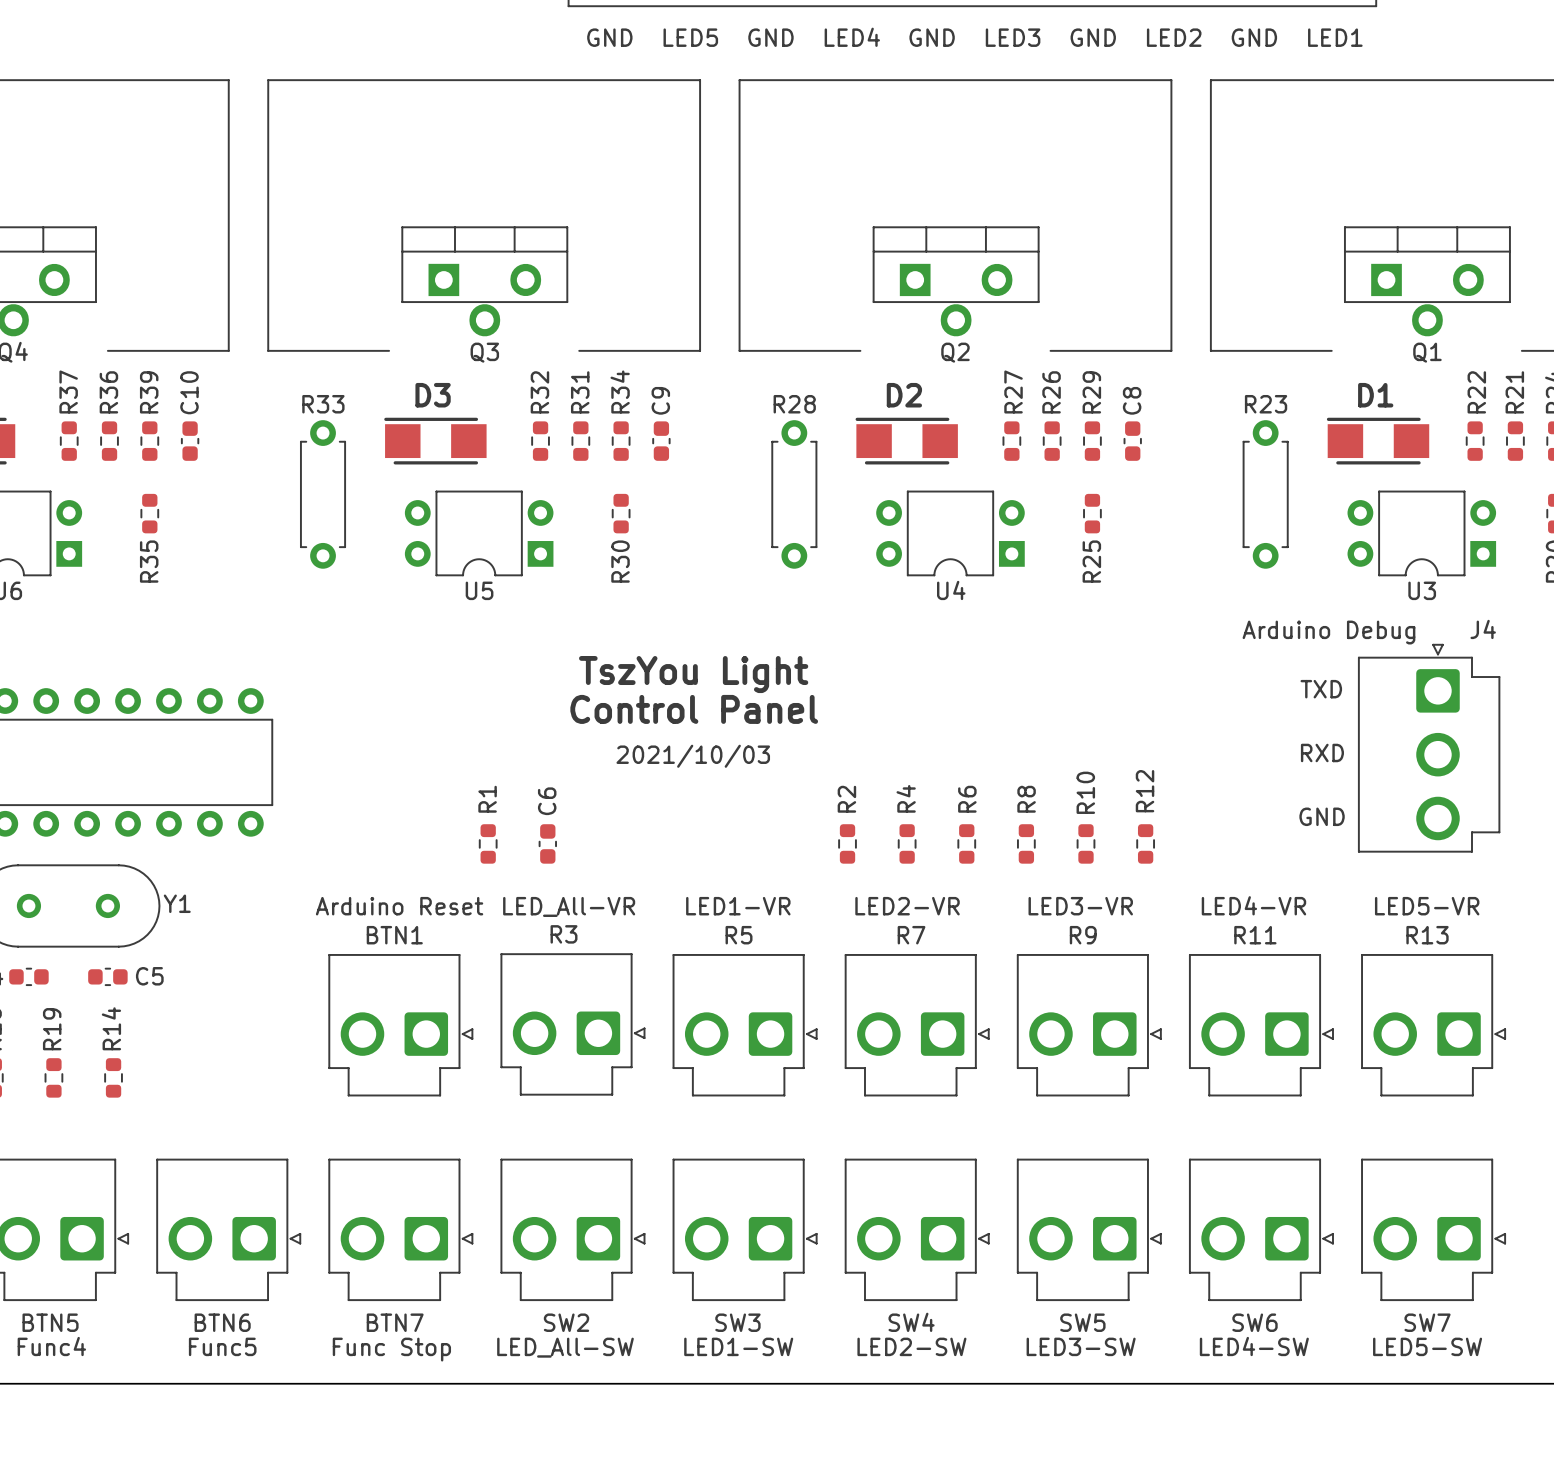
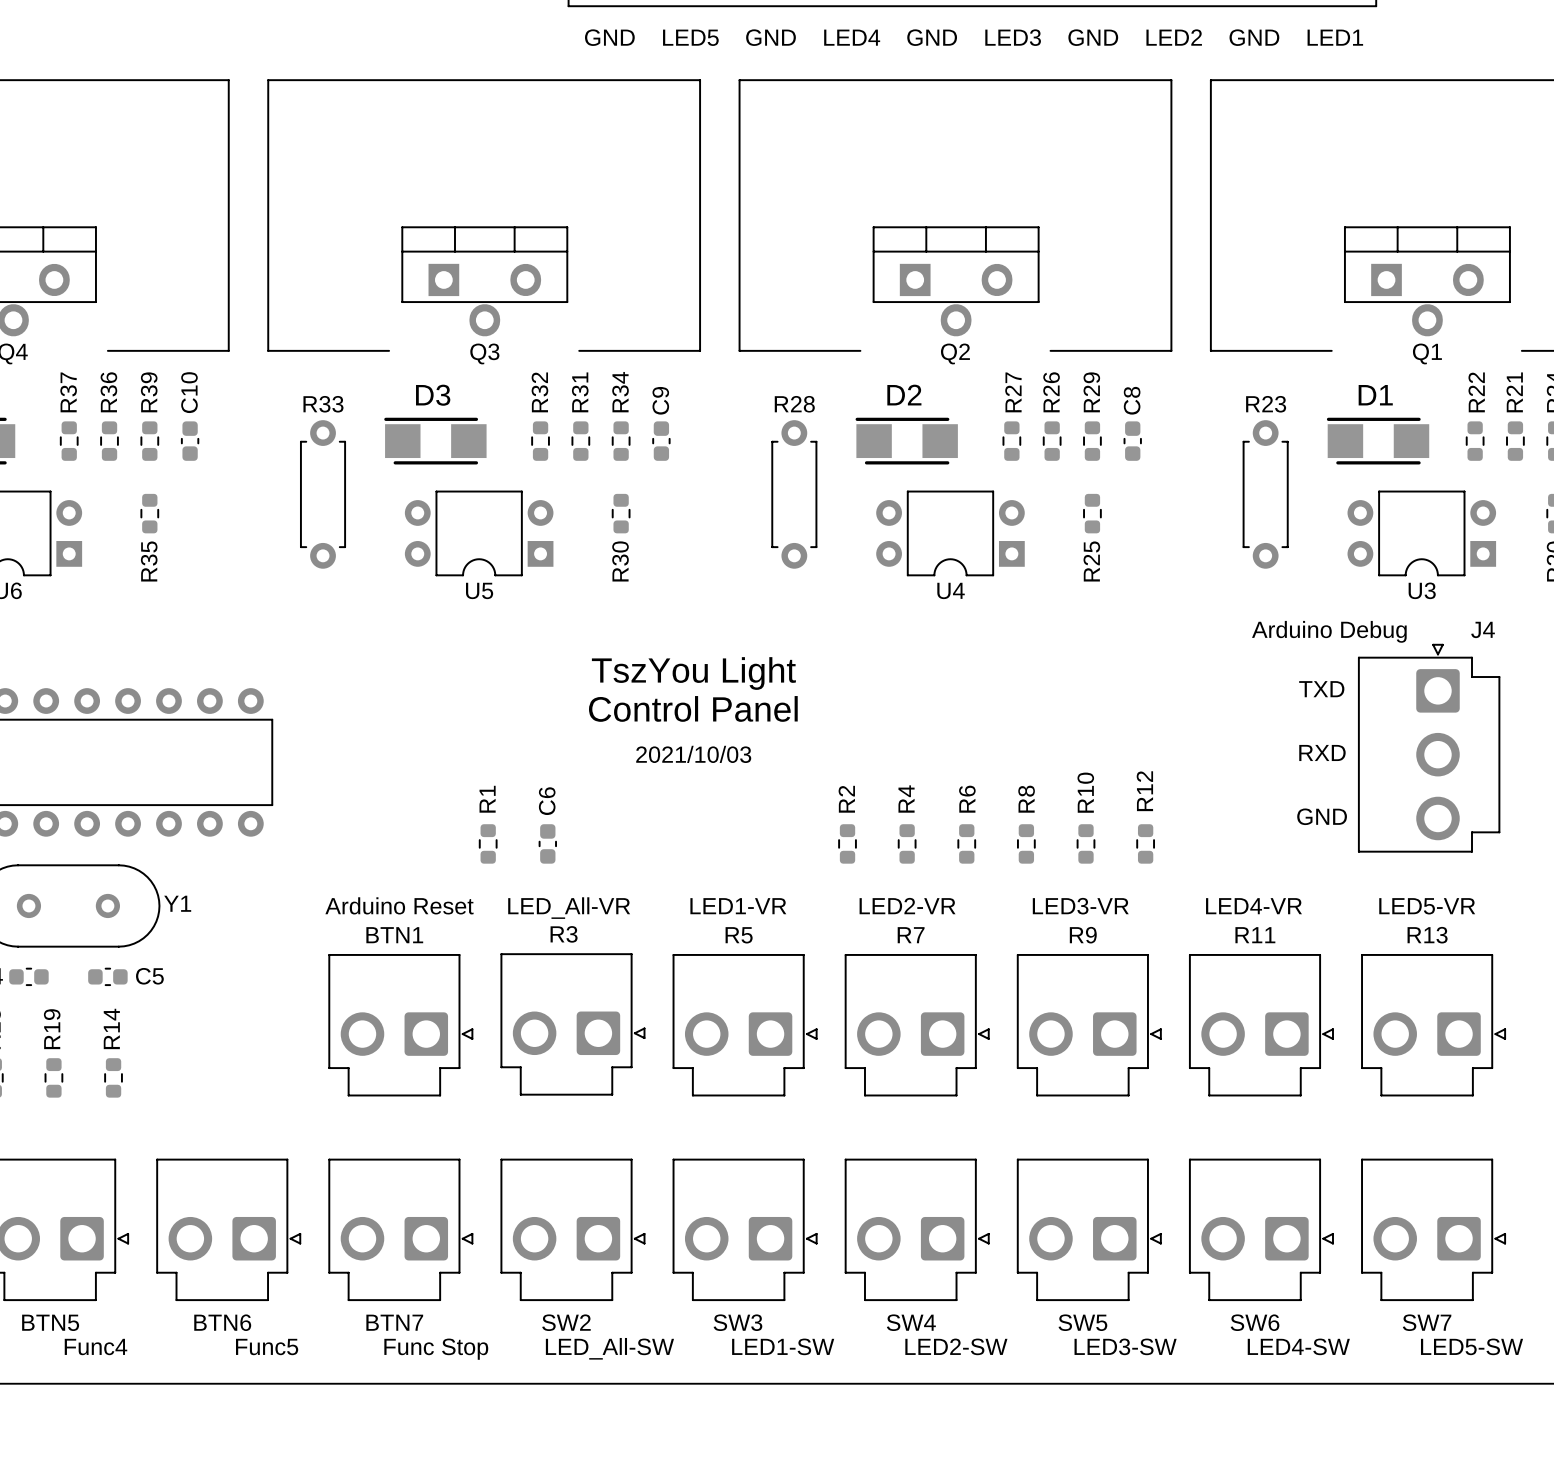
text position: Func4 (51, 1346) -> Func4 (96, 1347)
text position: Func5 (222, 1346) -> Func5 (267, 1347)
text position: LED1-SW (738, 1346) -> LED1-SW (783, 1346)
text position: LED2-SW (911, 1346) -> LED2-SW (956, 1346)
text position: LED3-SW (1081, 1346) -> LED3-SW (1125, 1346)
text position: LED4-SW (1254, 1346) -> LED4-SW (1298, 1346)
text position: LED5-SW (1427, 1346) -> LED5-SW (1472, 1346)
text position: LED_All-SW (565, 1347) -> LED_All-SW (609, 1348)
text position: Func Stop (391, 1349) -> Func Stop (436, 1349)

